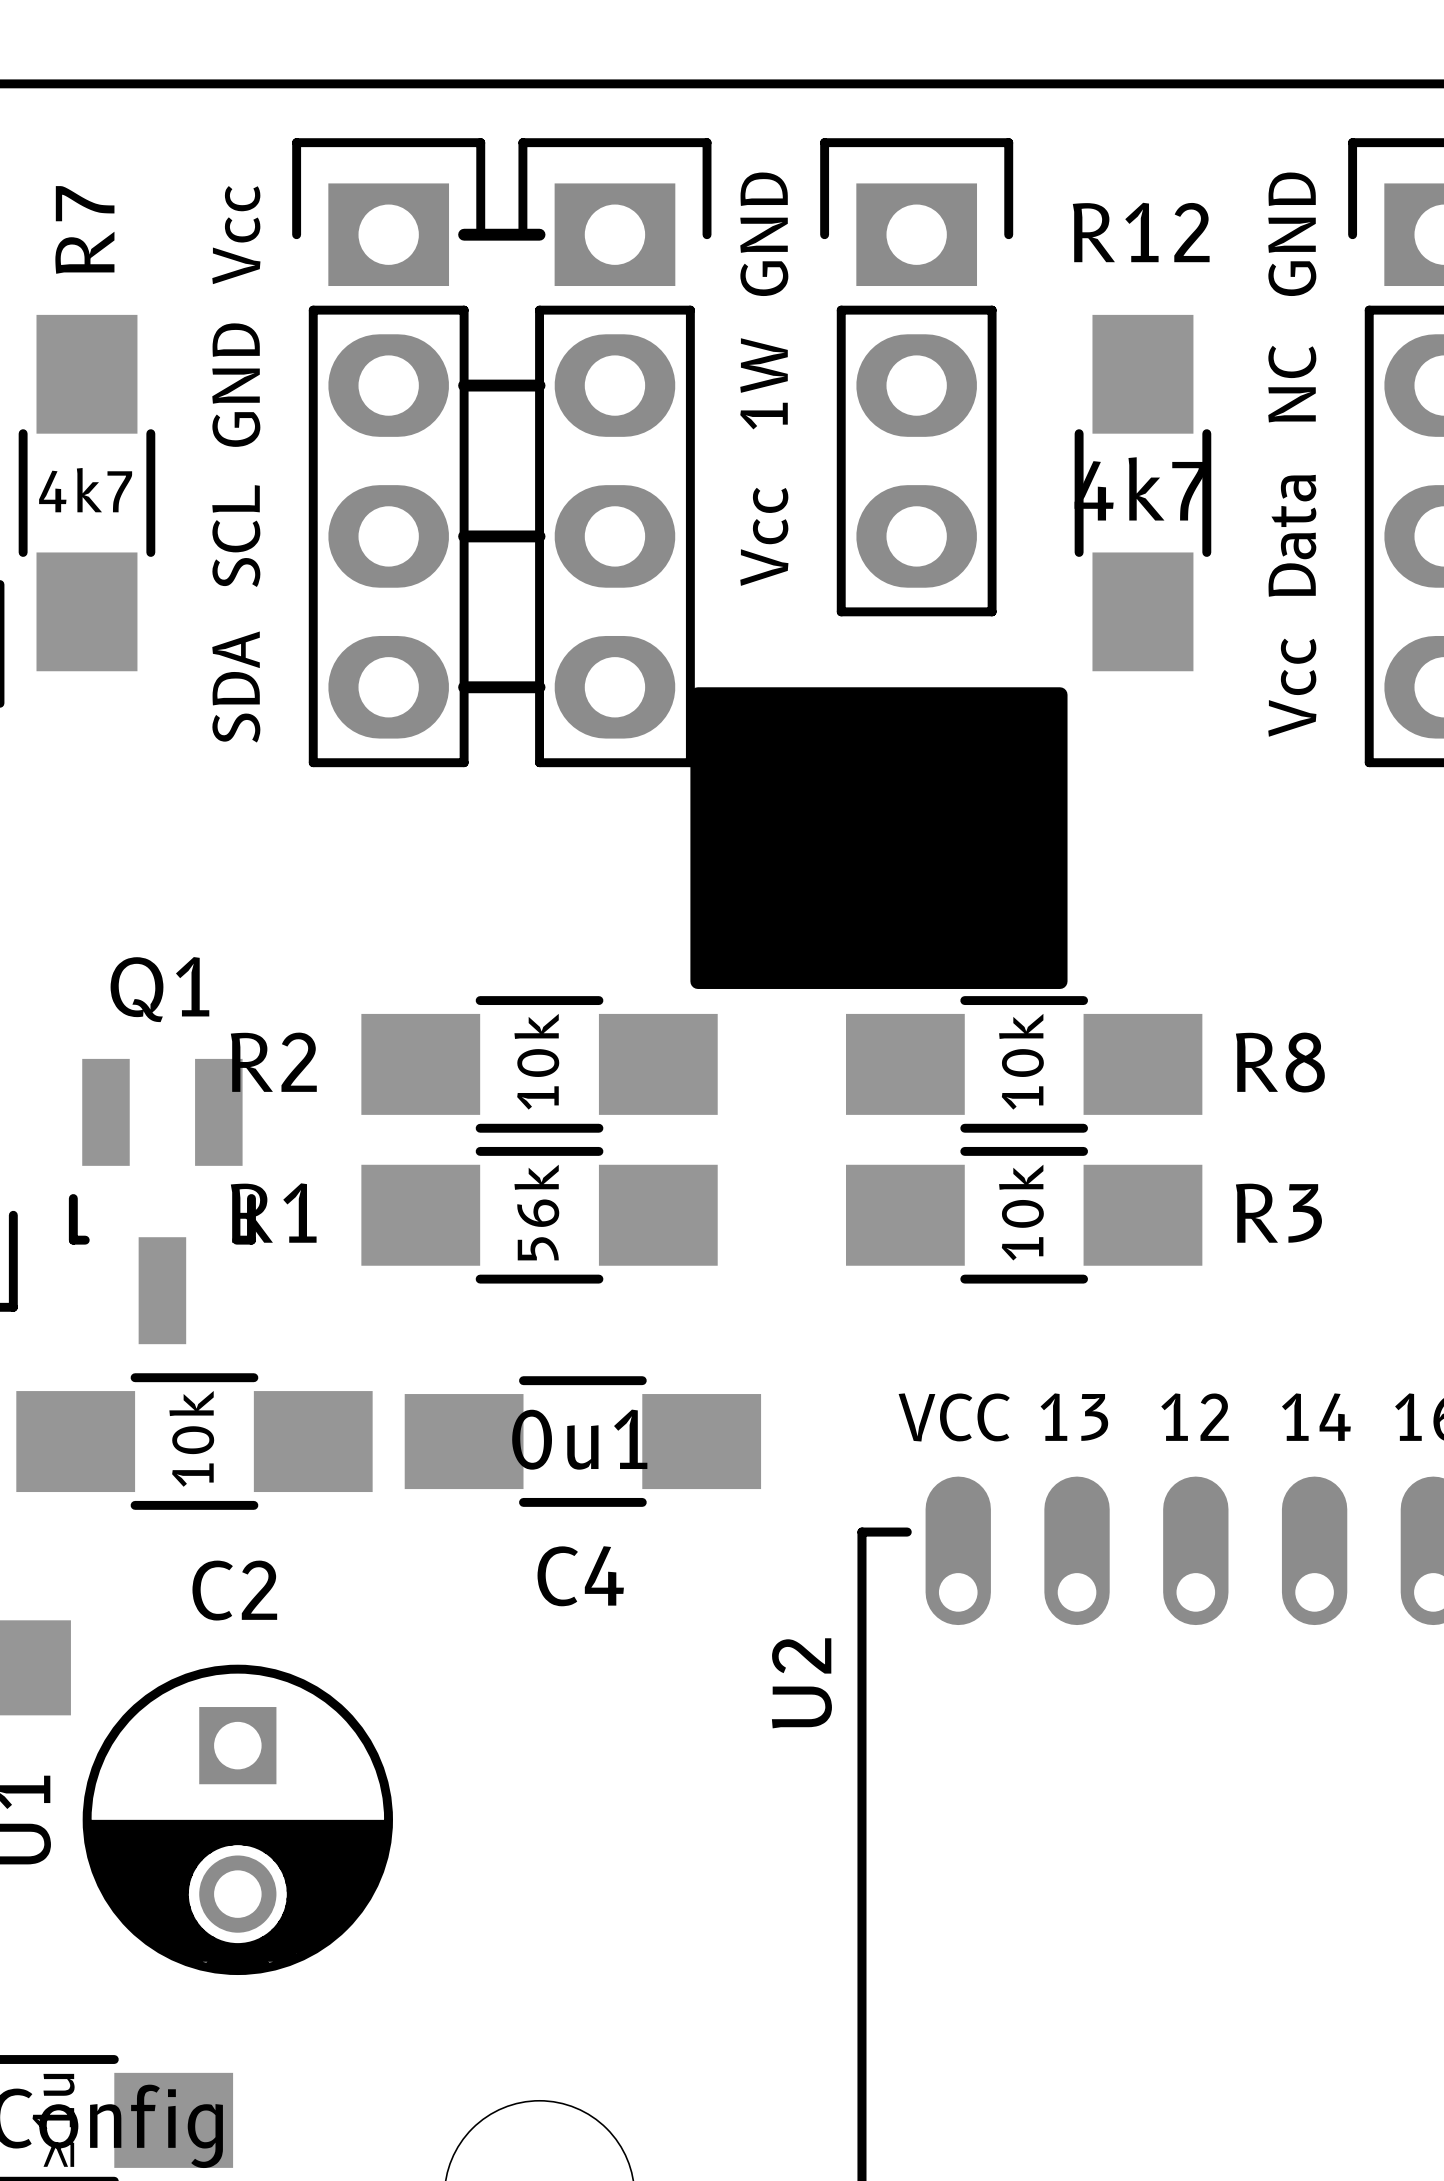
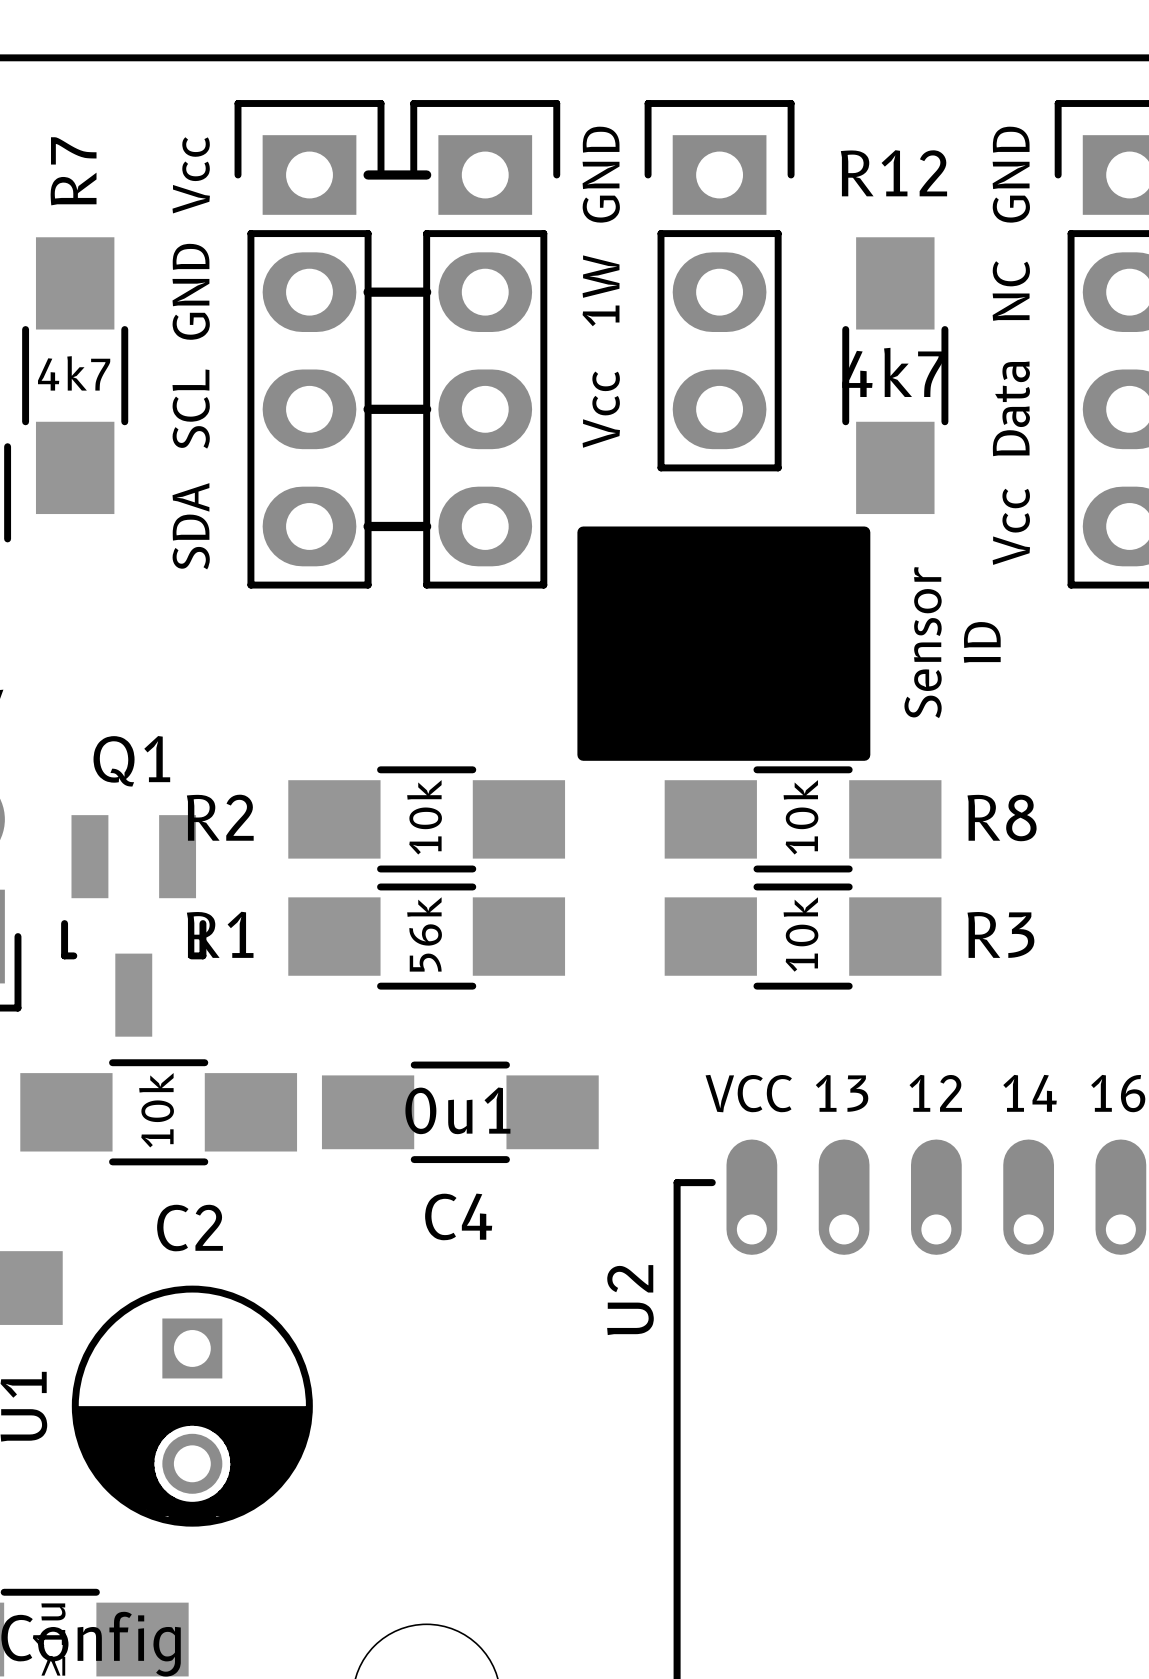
text: none -> Sensor (923, 642)
text: none -> ID (982, 642)
drawing position: (878, 838) -> (723, 643)

